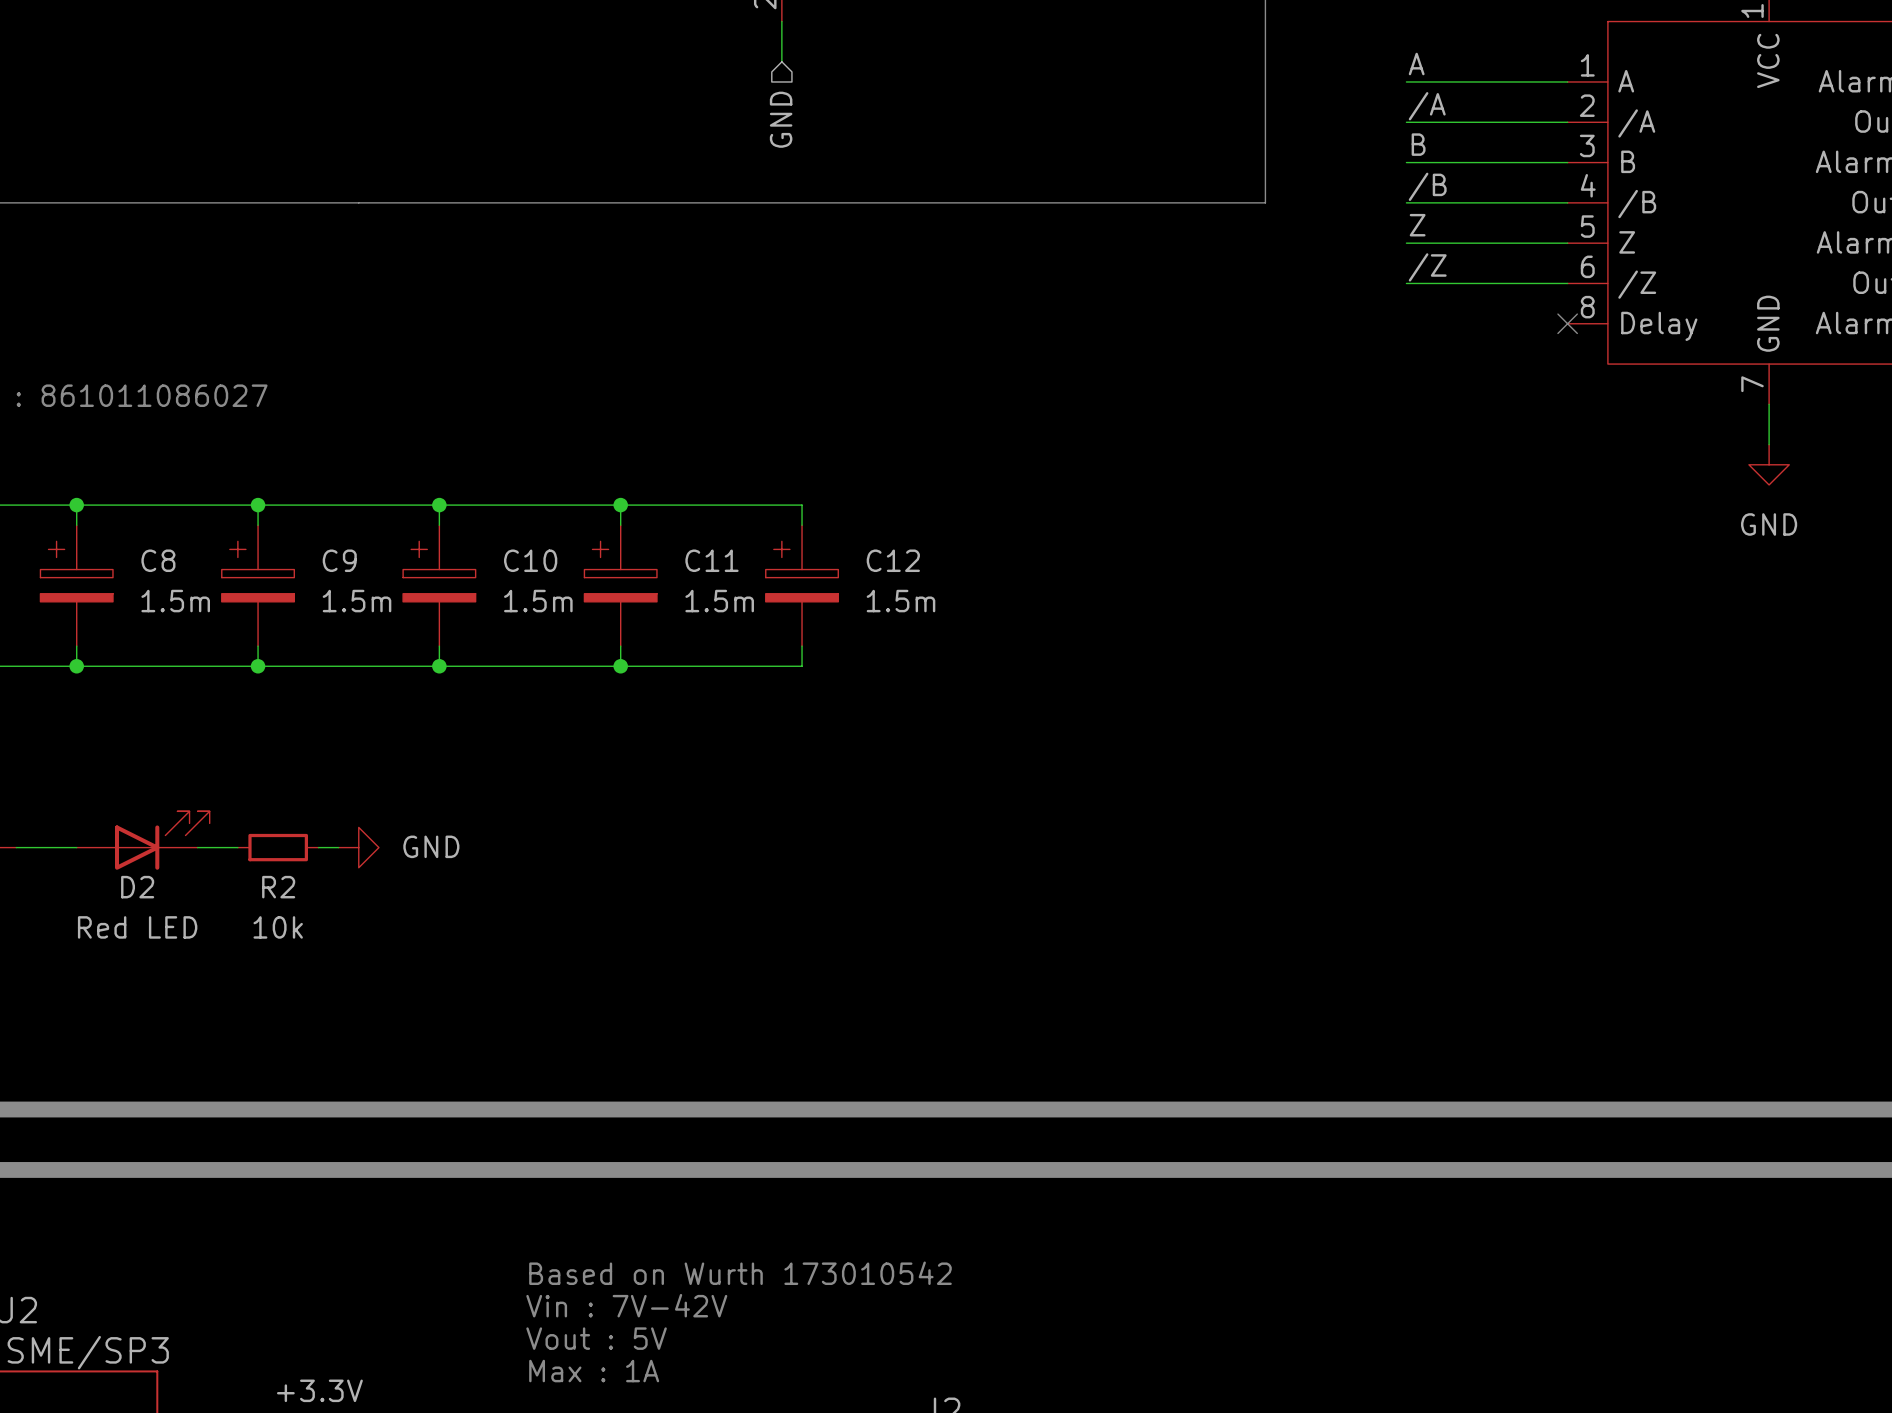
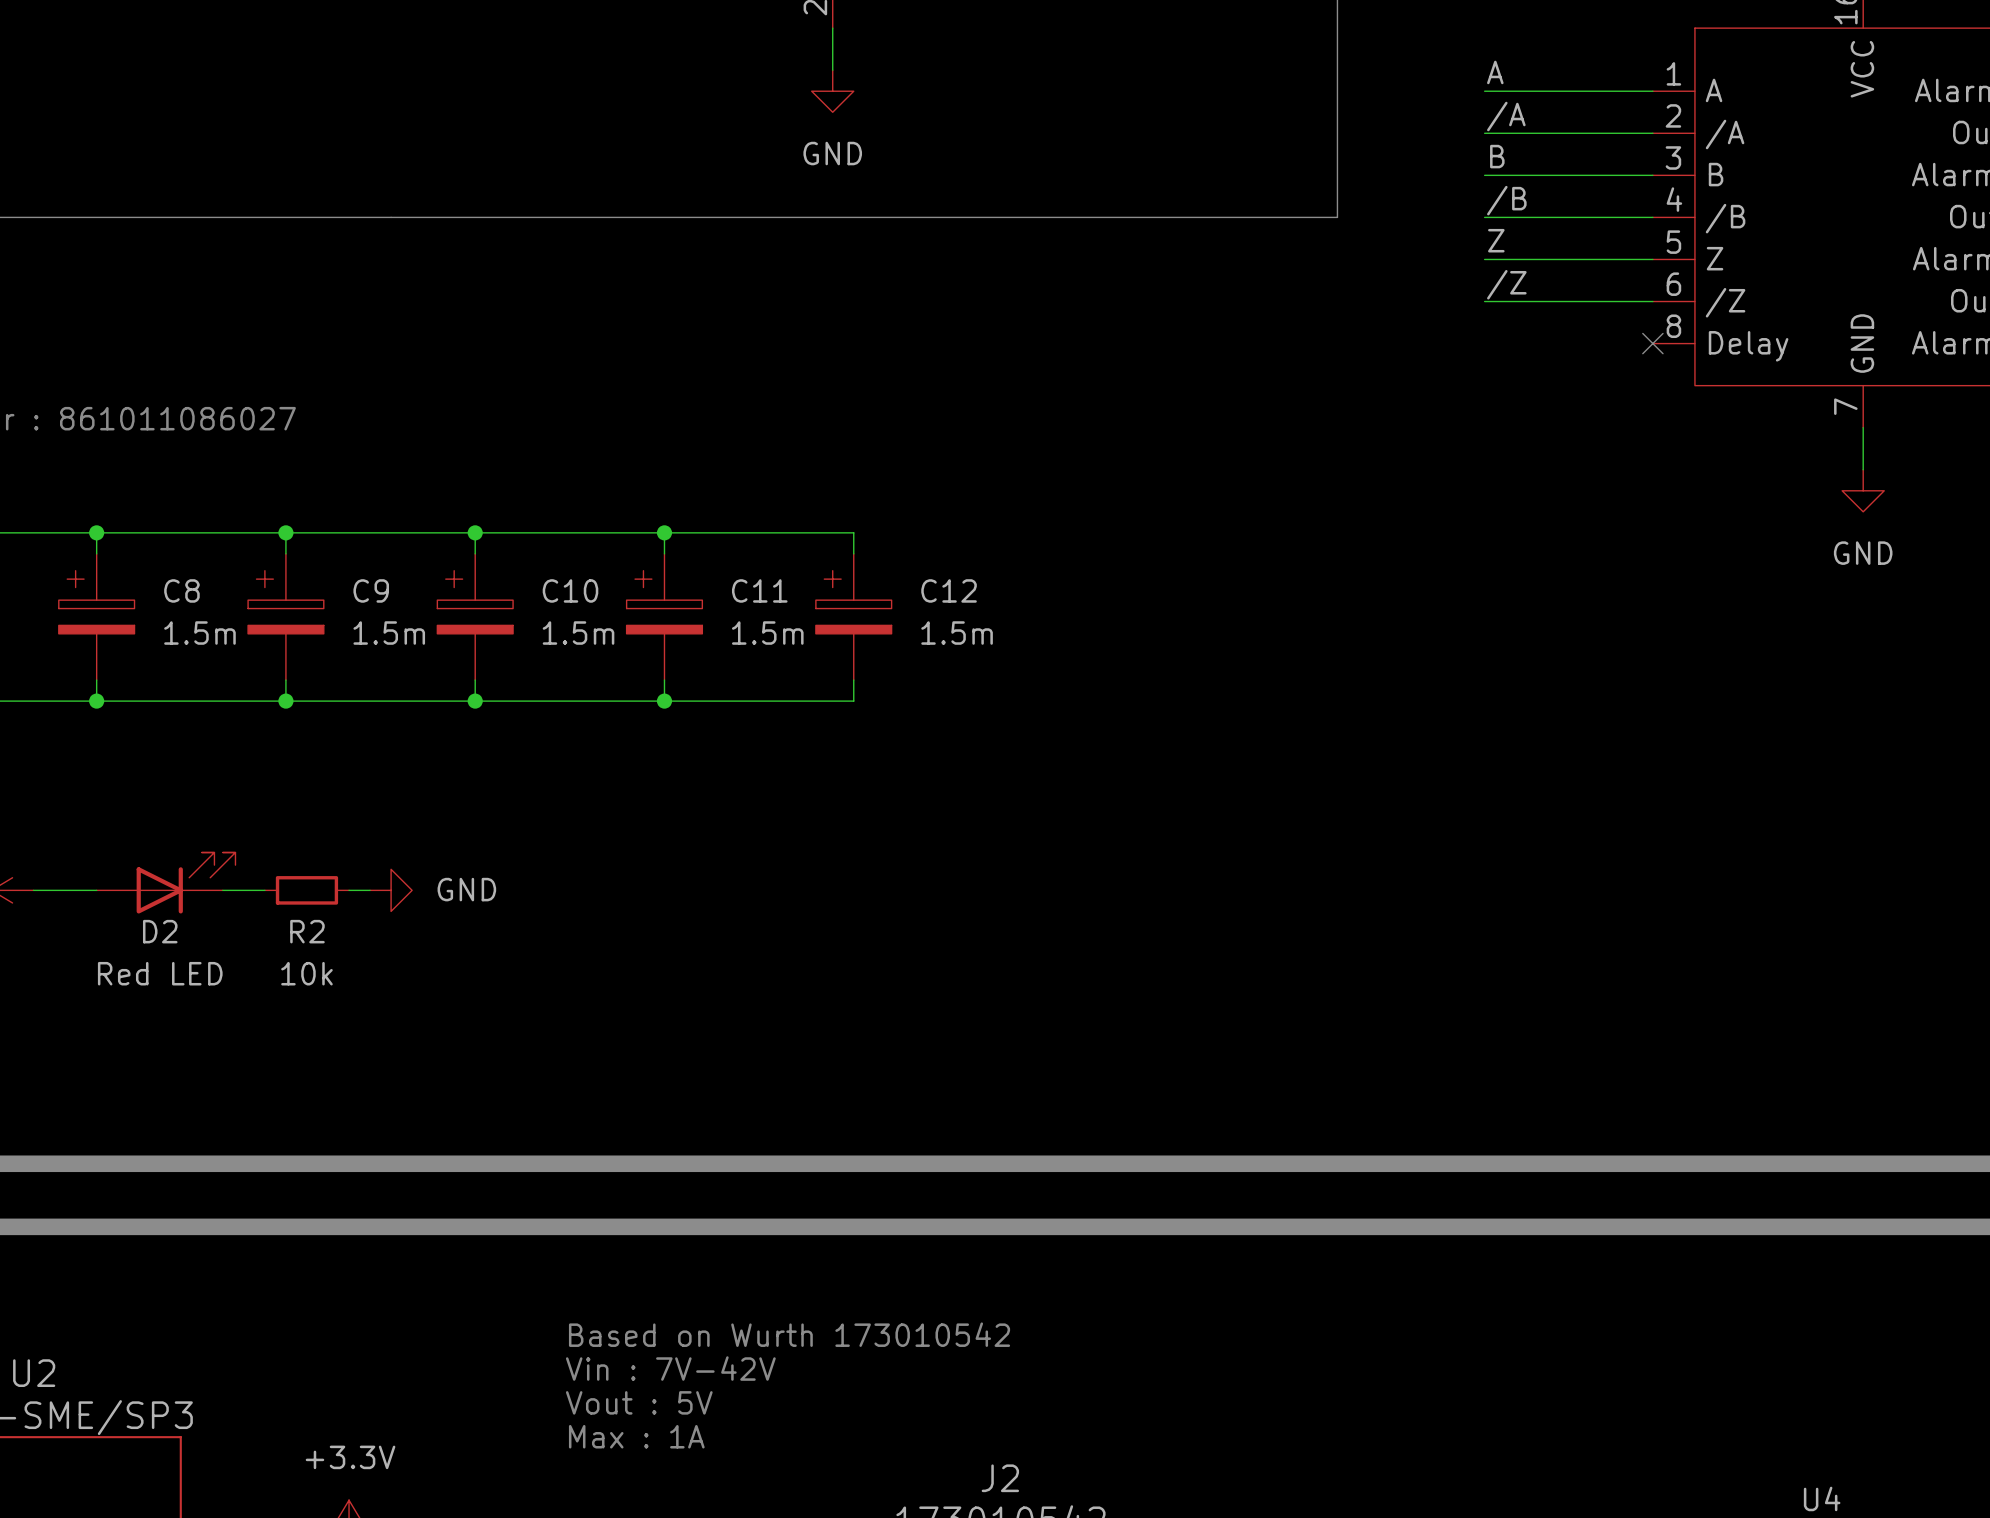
power symbol: none -> GND (832, 91)
hierarchical label: GND (781, 119) -> none

